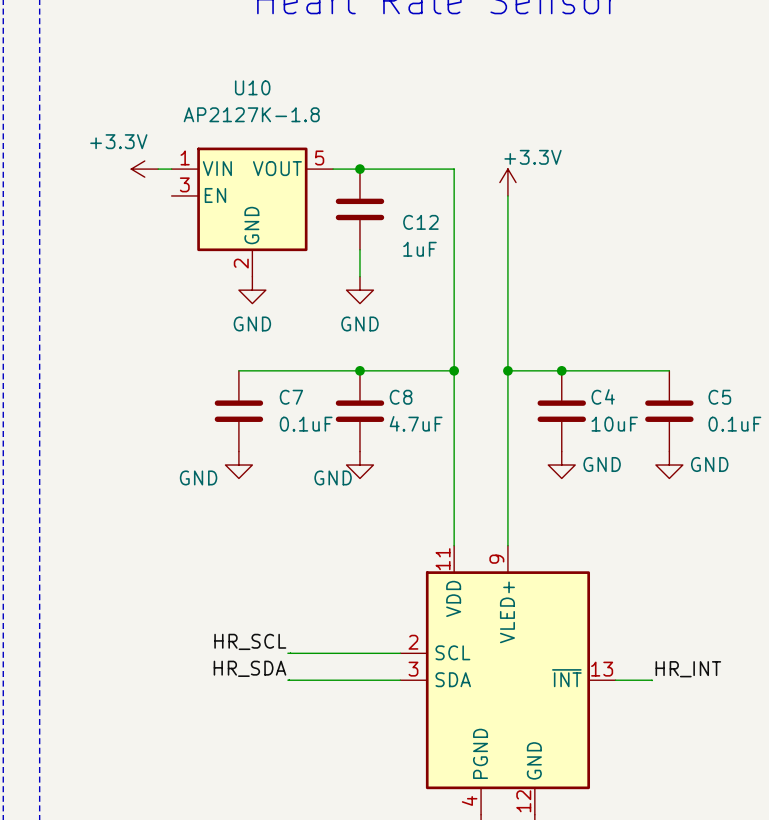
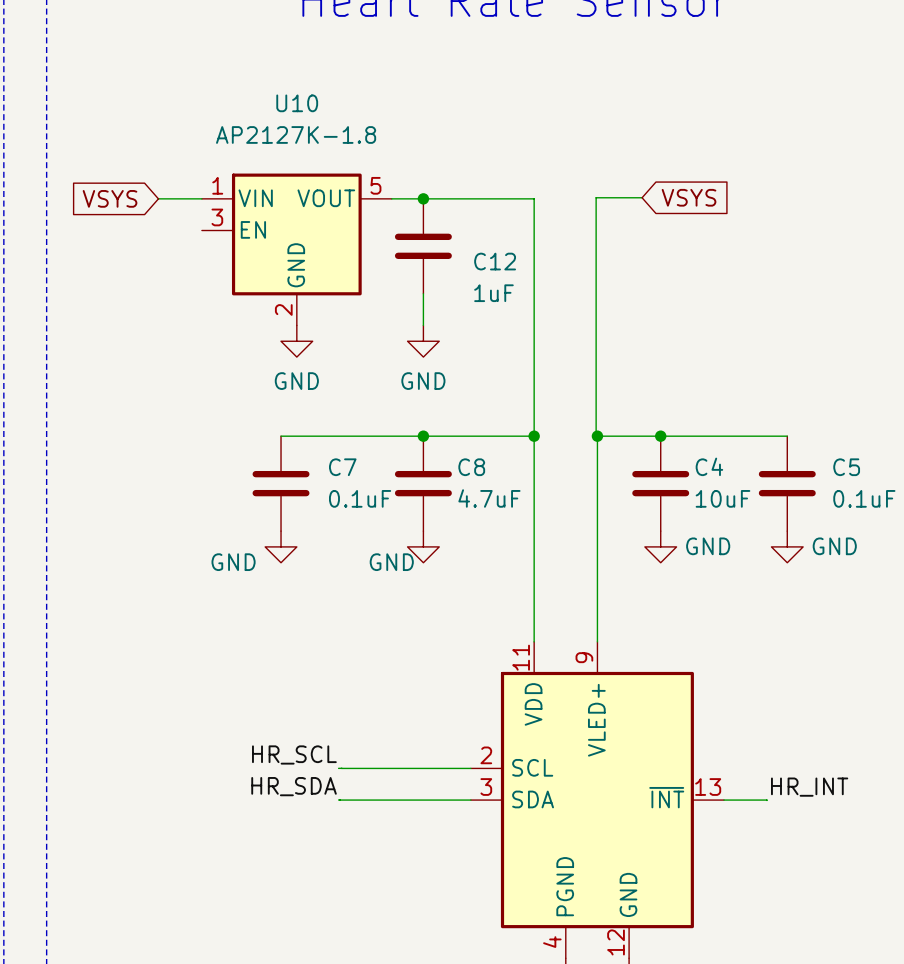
global label: none -> VSYS (689, 197)
global label: none -> VSYS (110, 198)
power symbol: +3.3V (144, 169) -> none
power symbol: +3.3V (507, 182) -> none
wire: (507, 195) (507, 370) -> (642, 197) (596, 197) (597, 436)

